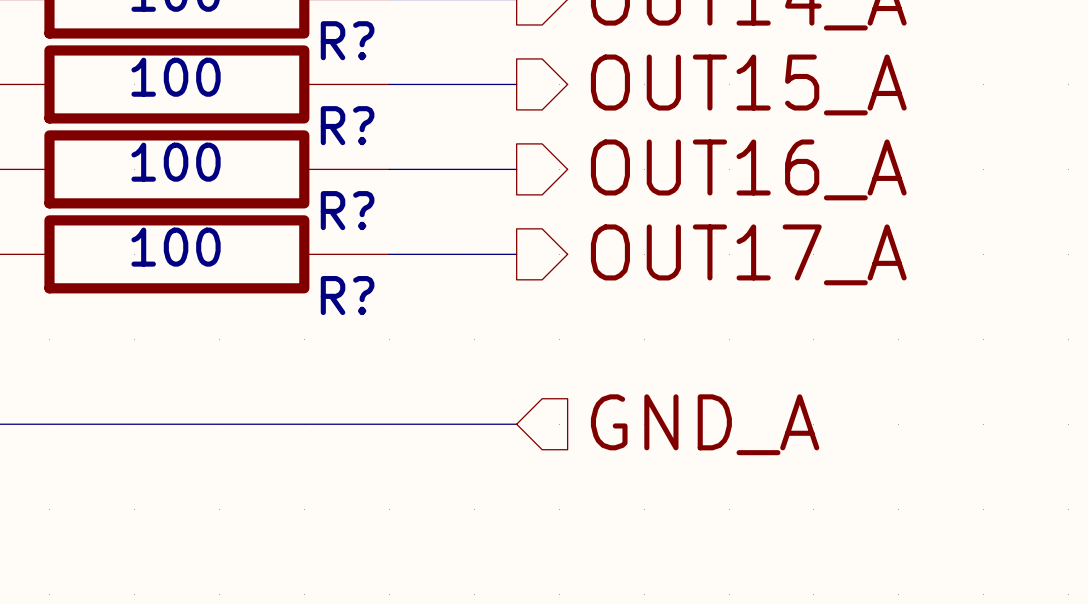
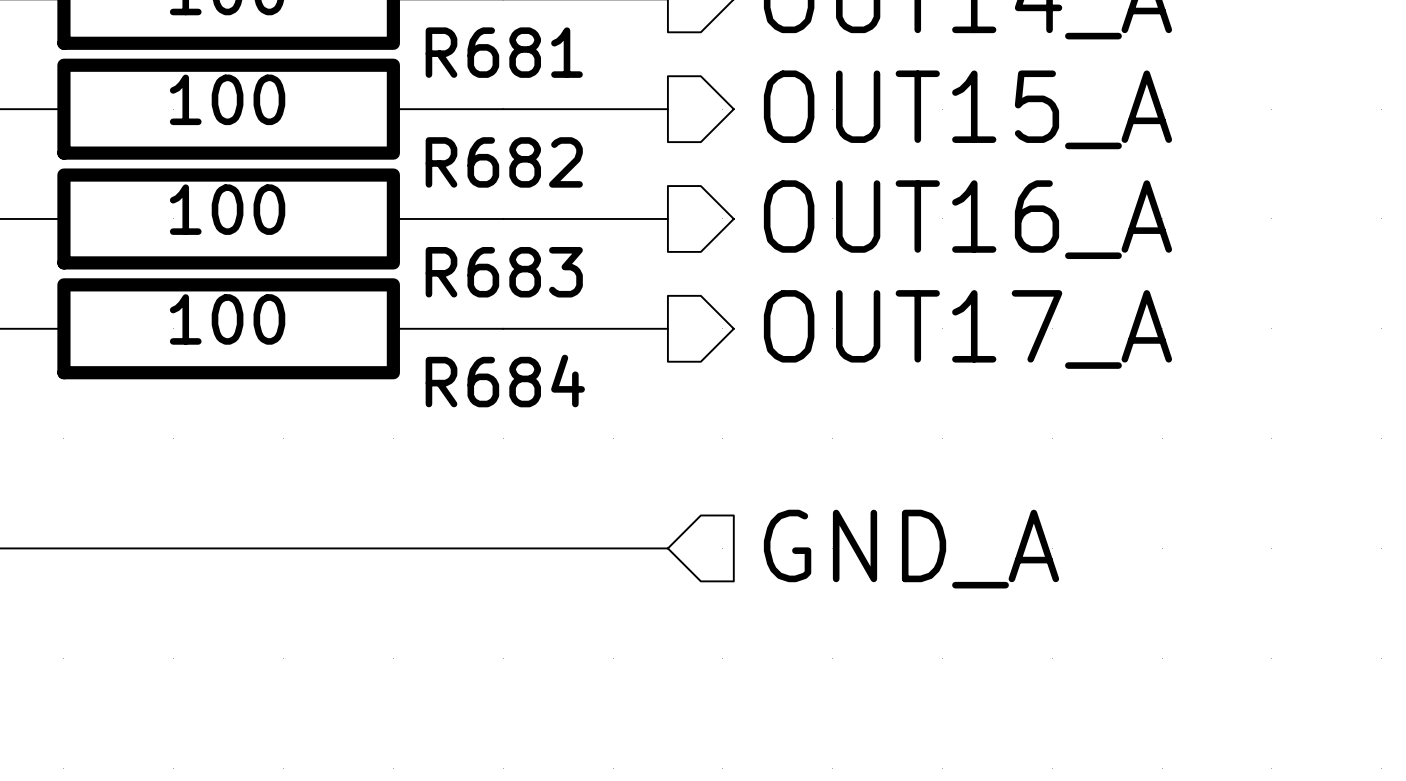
R? name: R? (347, 40) -> R681 (504, 52)
R? name: R? (347, 125) -> R682 (504, 162)
R? name: R? (347, 210) -> R683 (504, 272)
R? name: R? (347, 295) -> R684 (505, 381)

